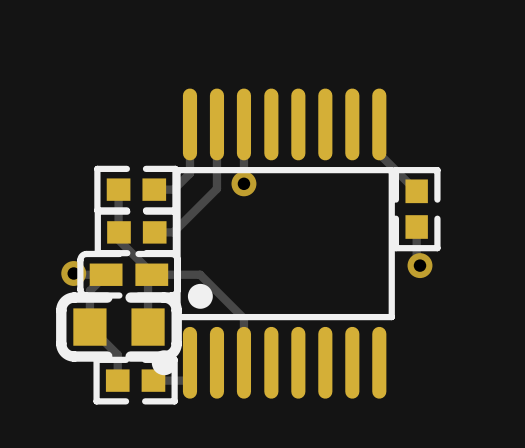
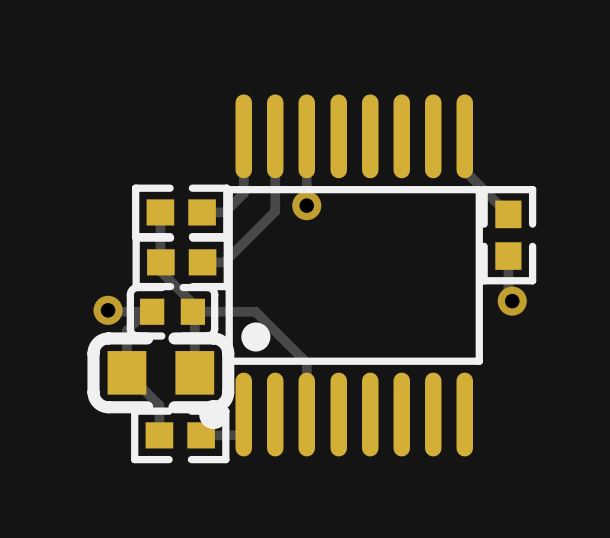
part footprint: [77, 250, 181, 299] -> [126, 283, 219, 340]

